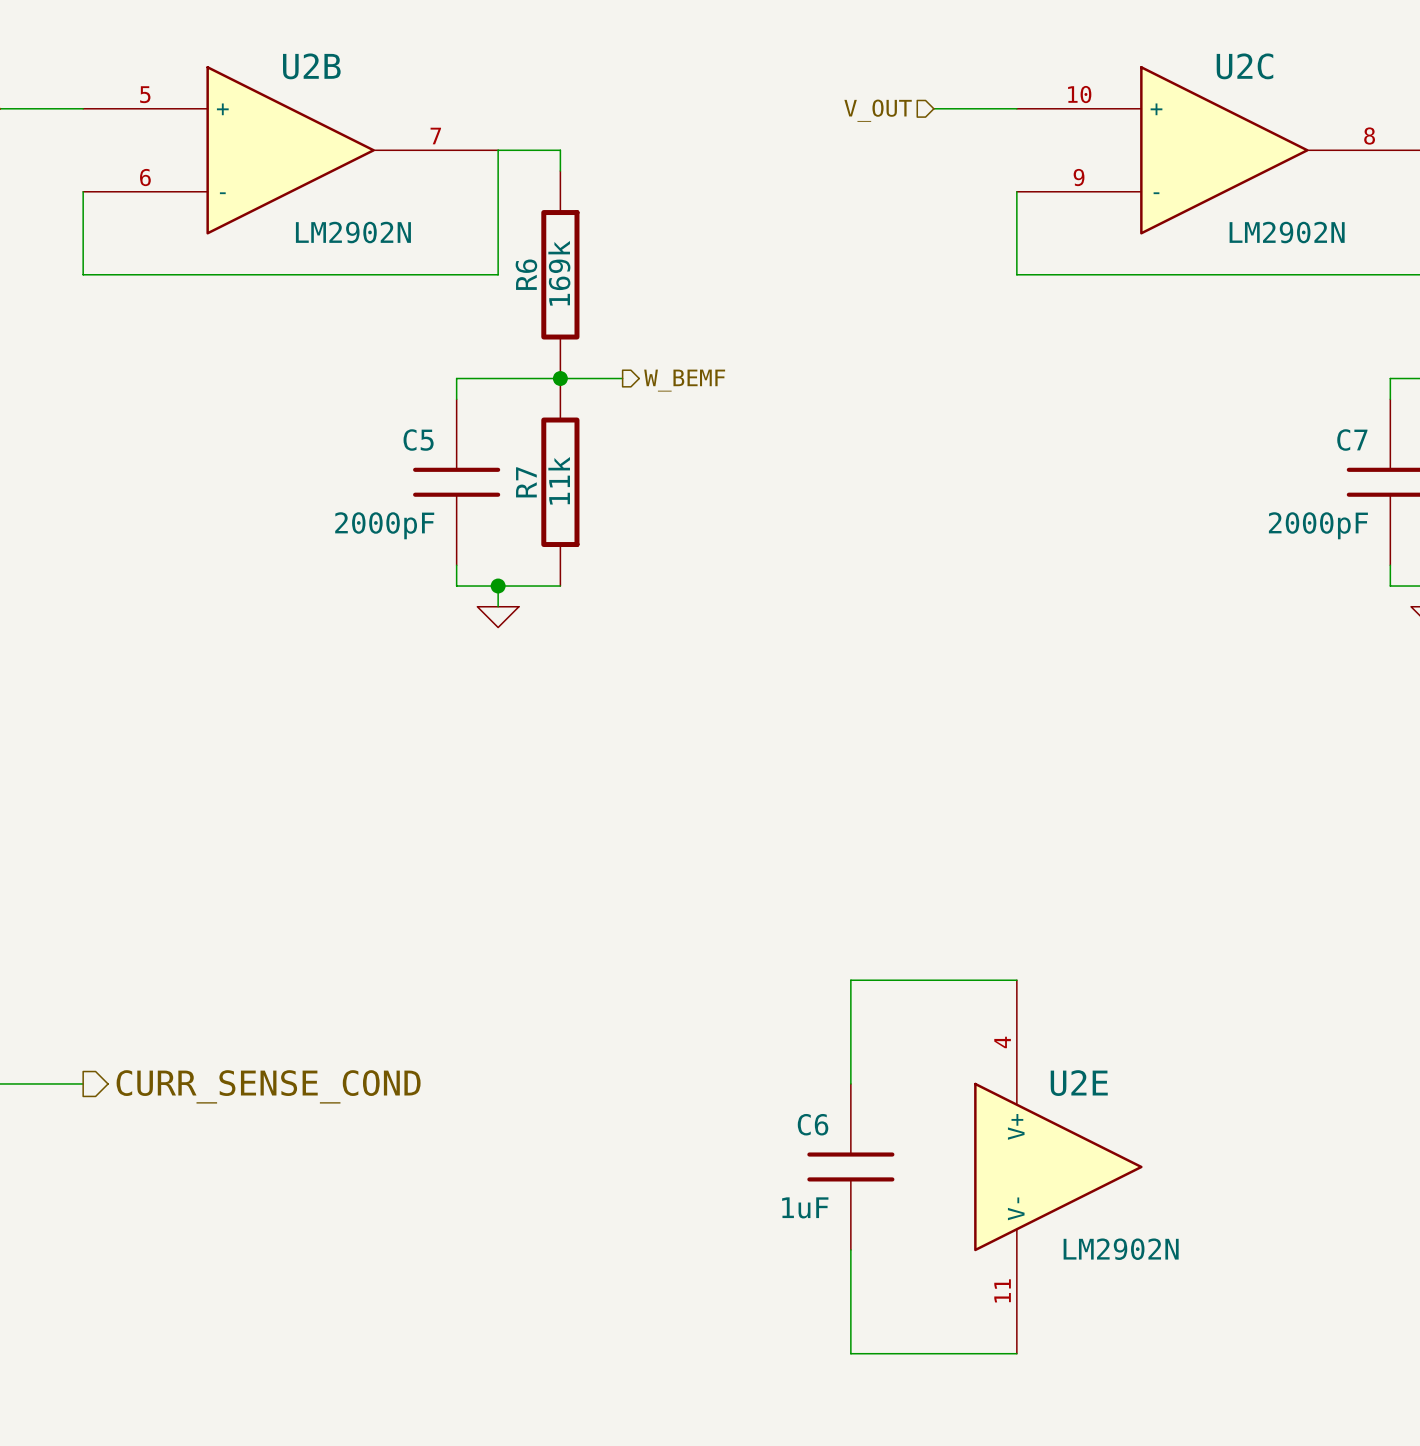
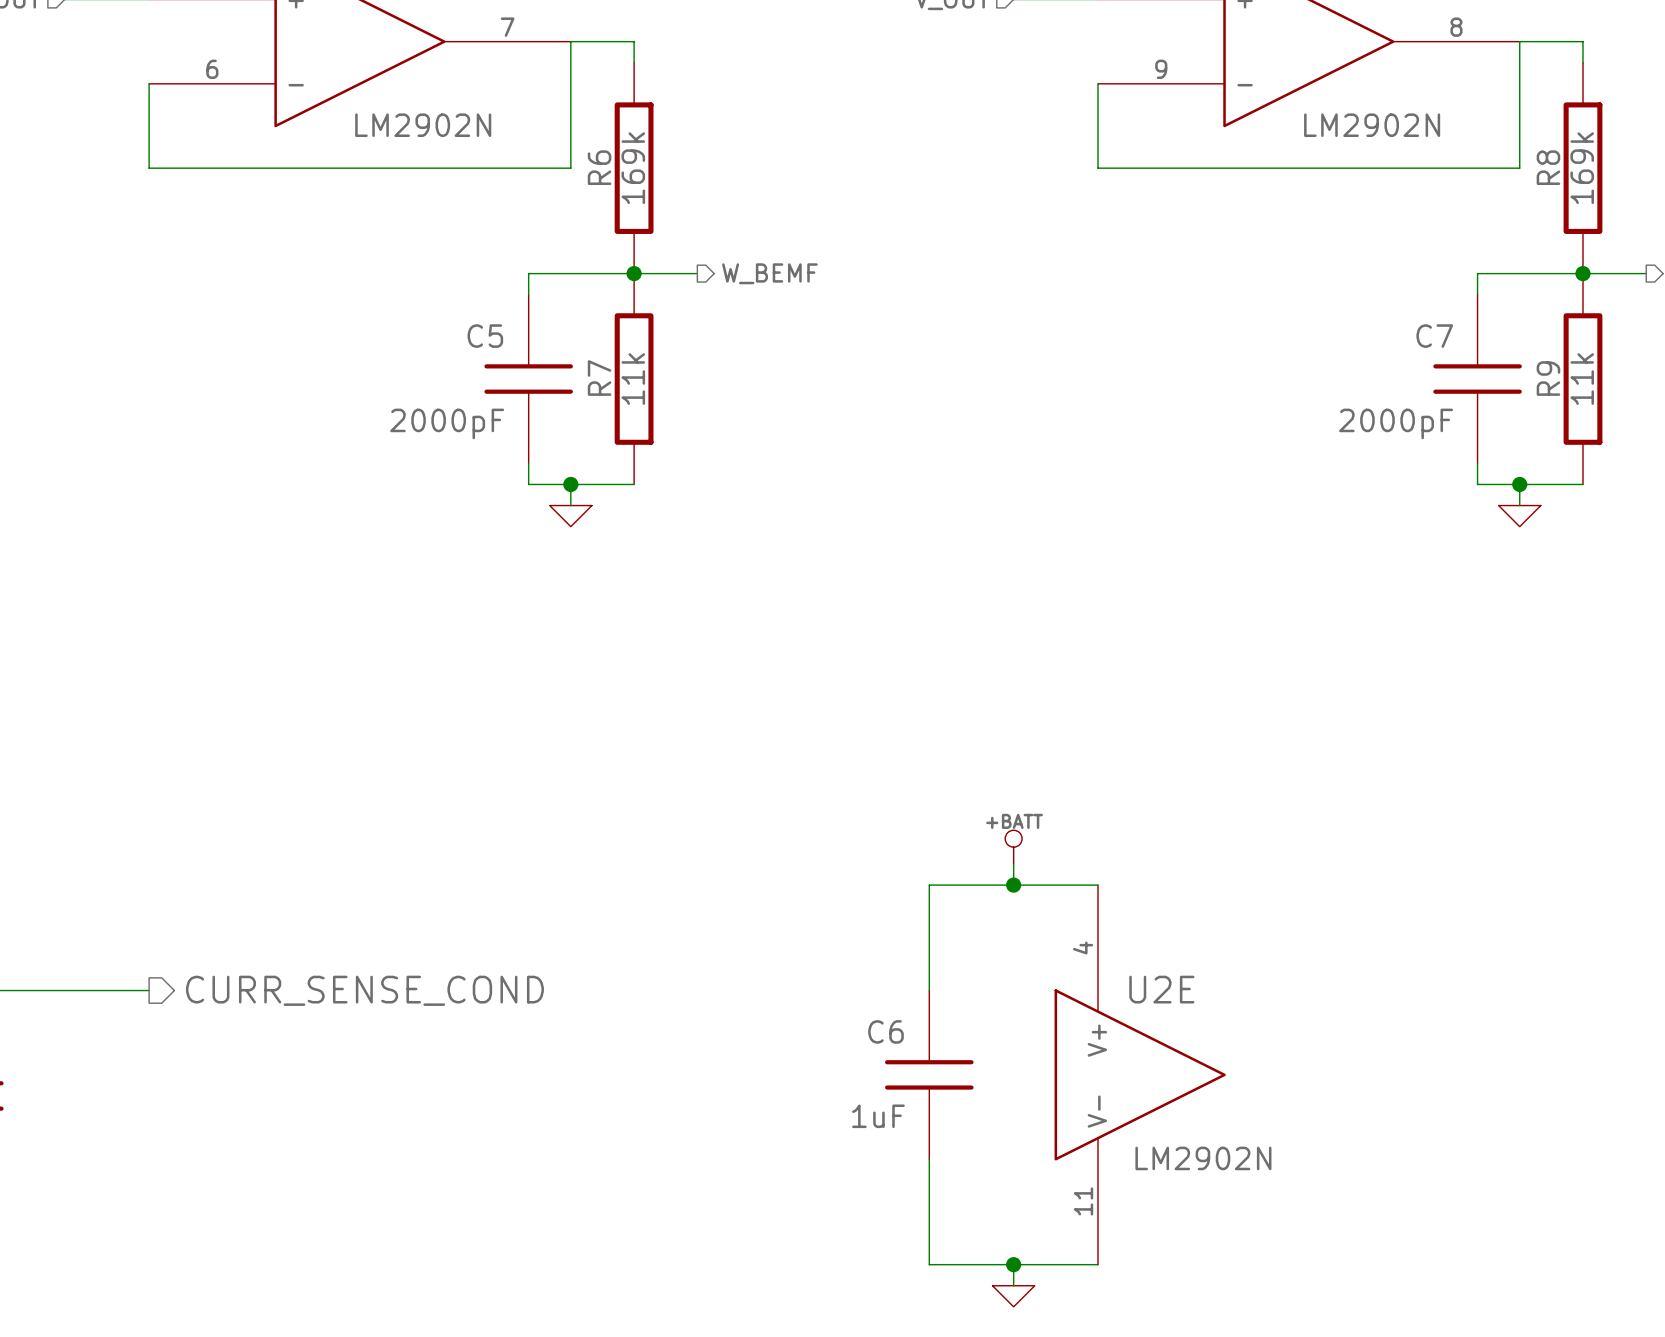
power symbol: none -> +BATT (1013, 847)
wire: none -> (1013, 864) (1013, 885)
junction: none -> (1013, 885)
wire: none -> (1013, 1264) (1013, 1285)
junction: none -> (1013, 1264)
power symbol: none -> (1013, 1296)

